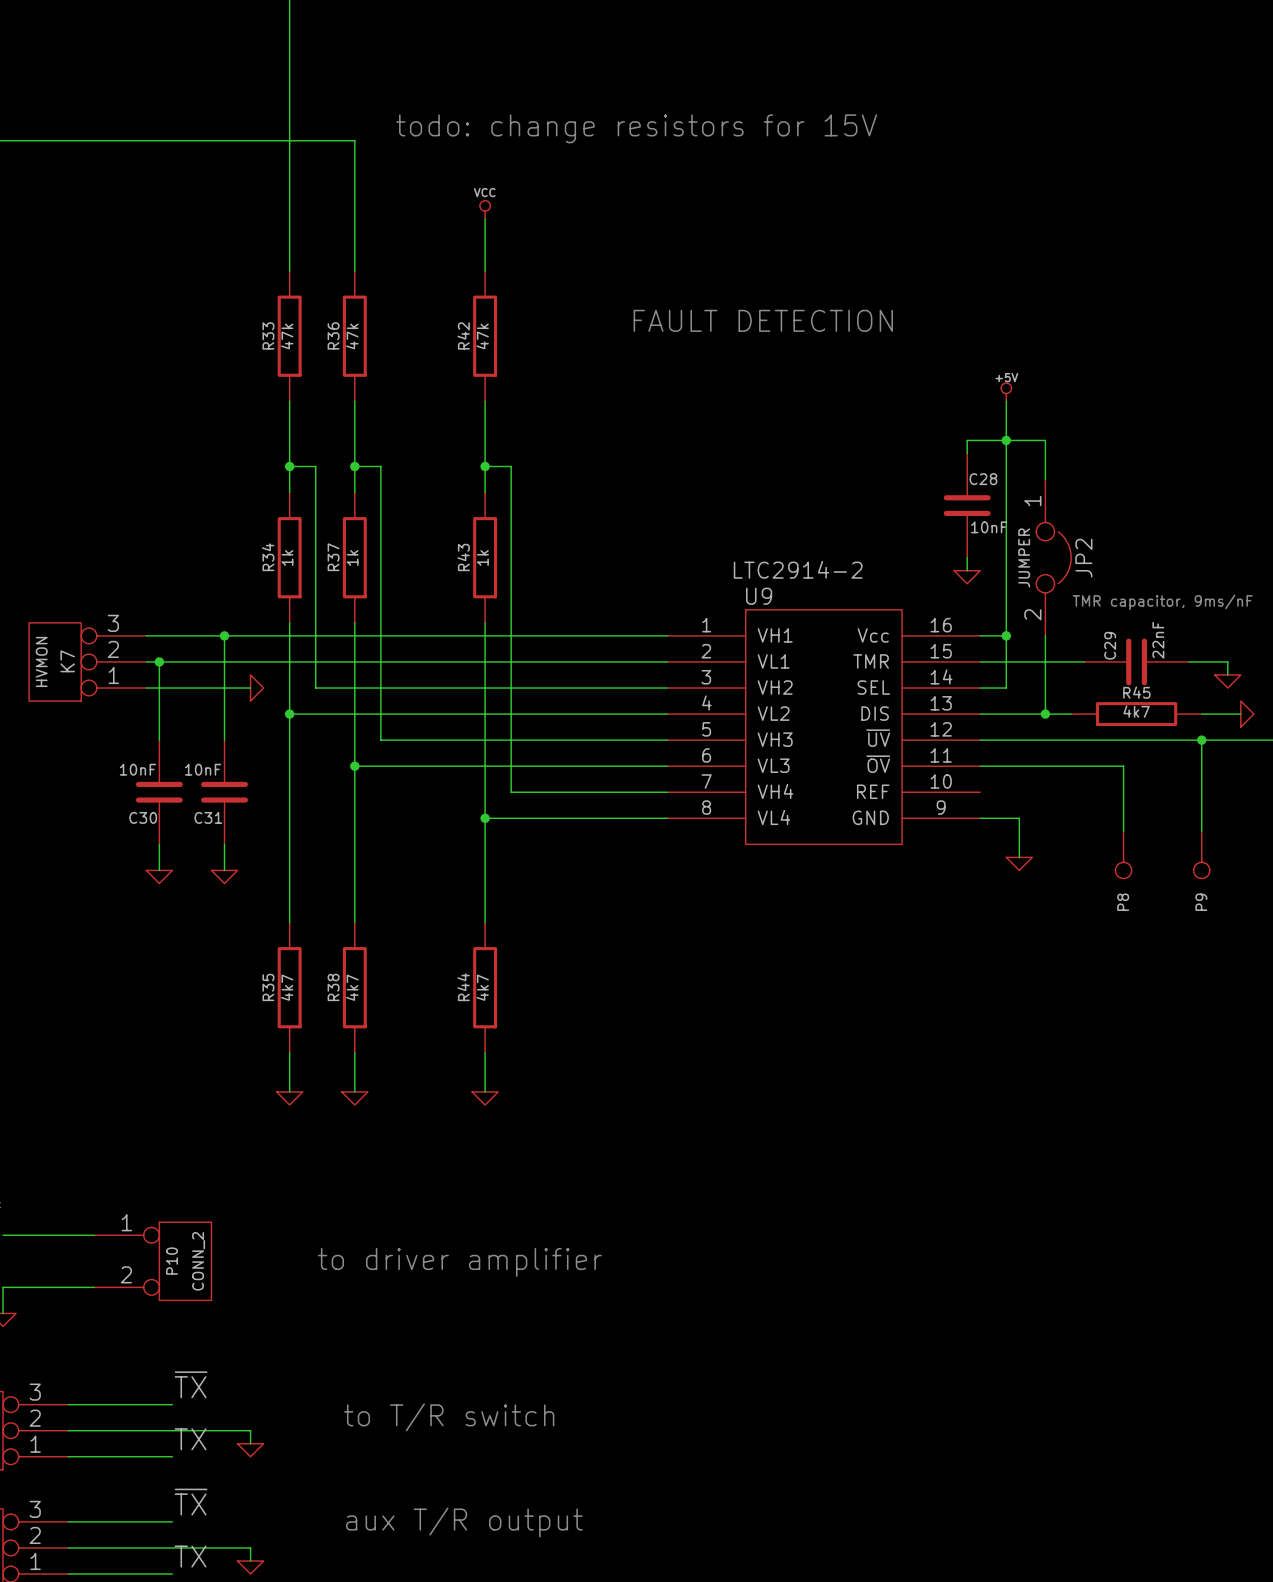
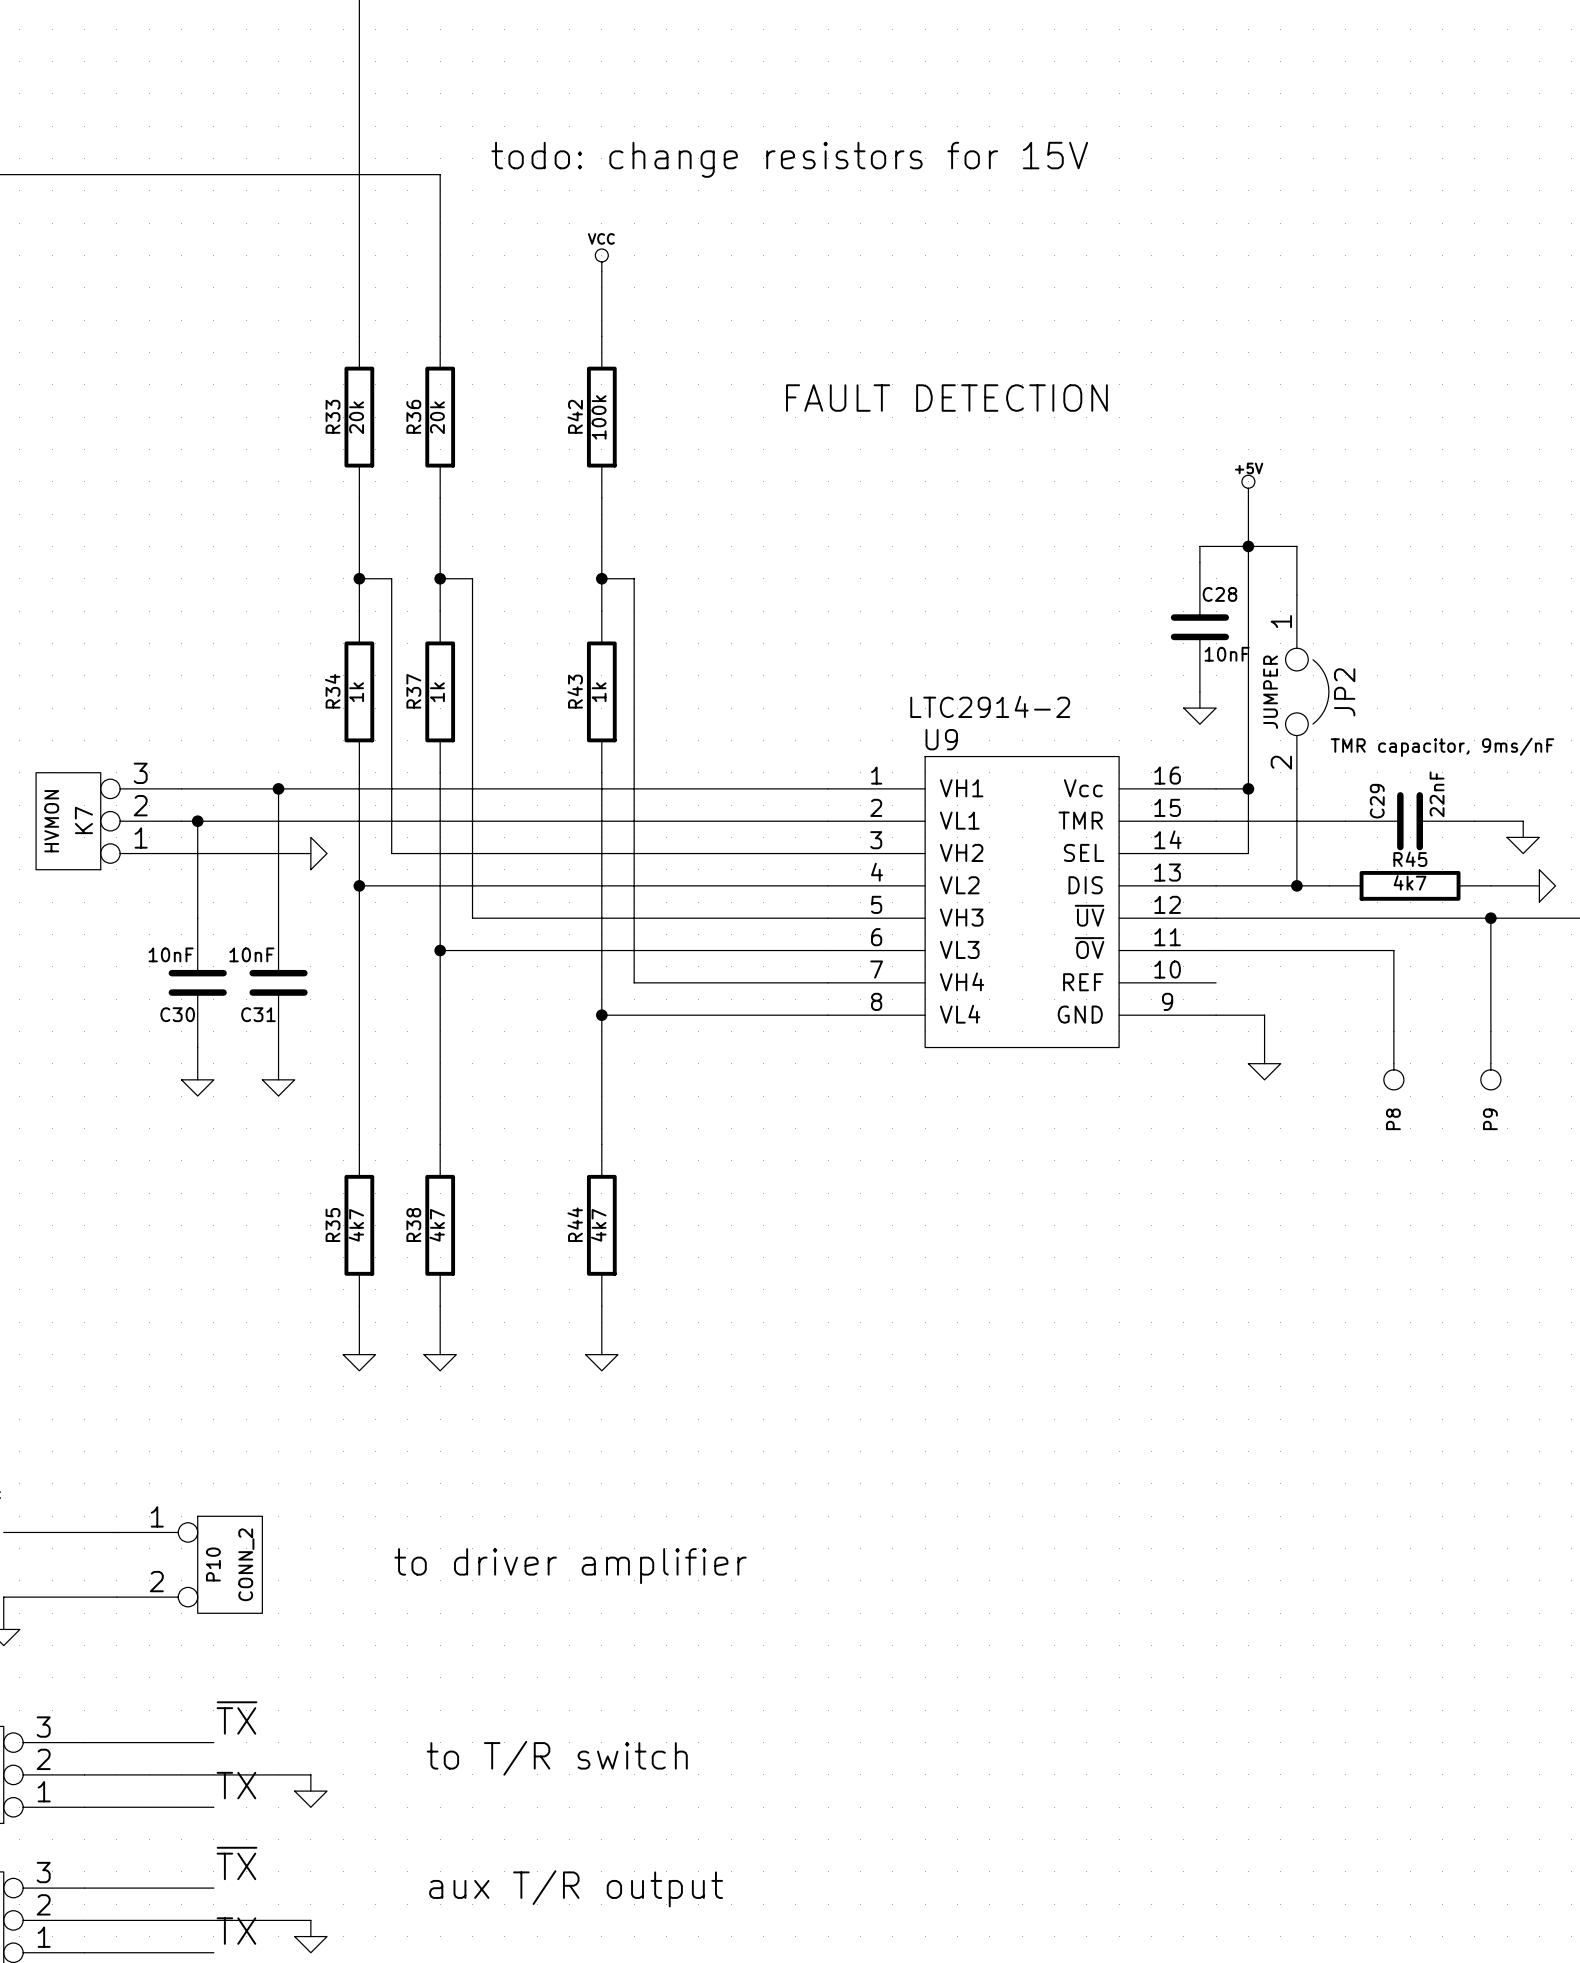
R33 value: 47k (287, 336) -> 20k (356, 417)
R36 value: 47k (352, 336) -> 20k (437, 417)
R42 value: 47k (482, 336) -> 100k (599, 417)

